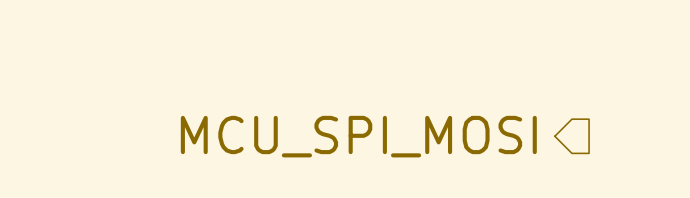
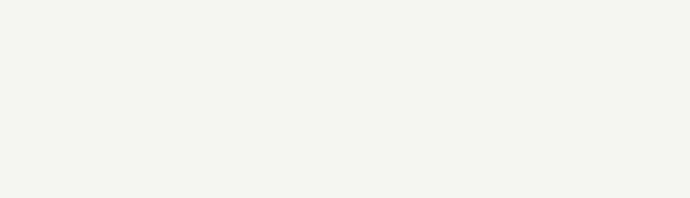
hierarchical label: MCU_SPI_MOSI (358, 136) -> none

